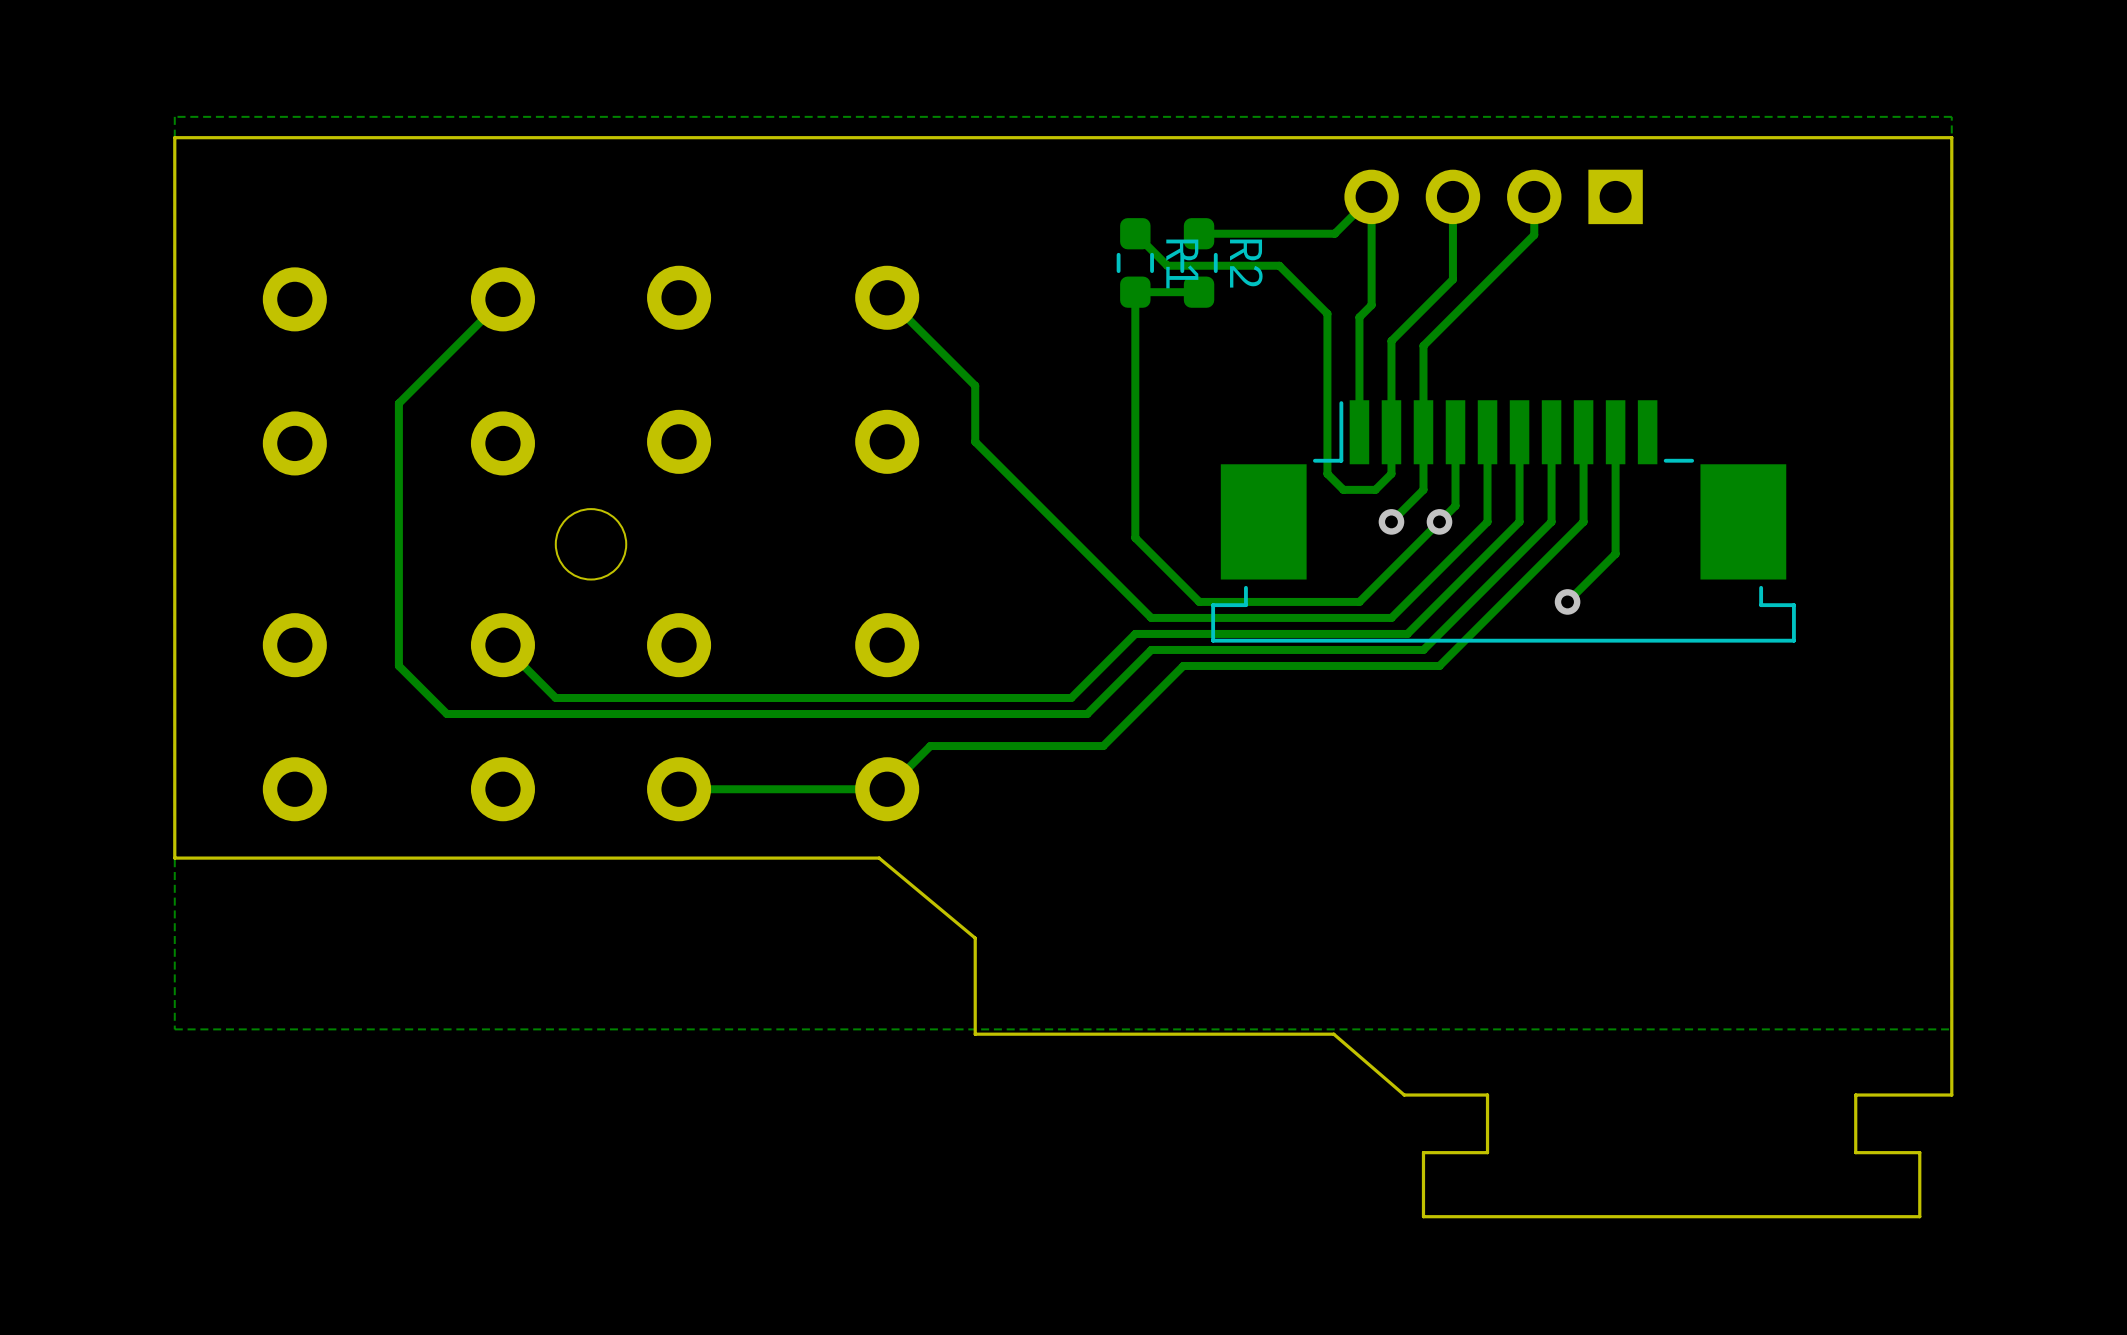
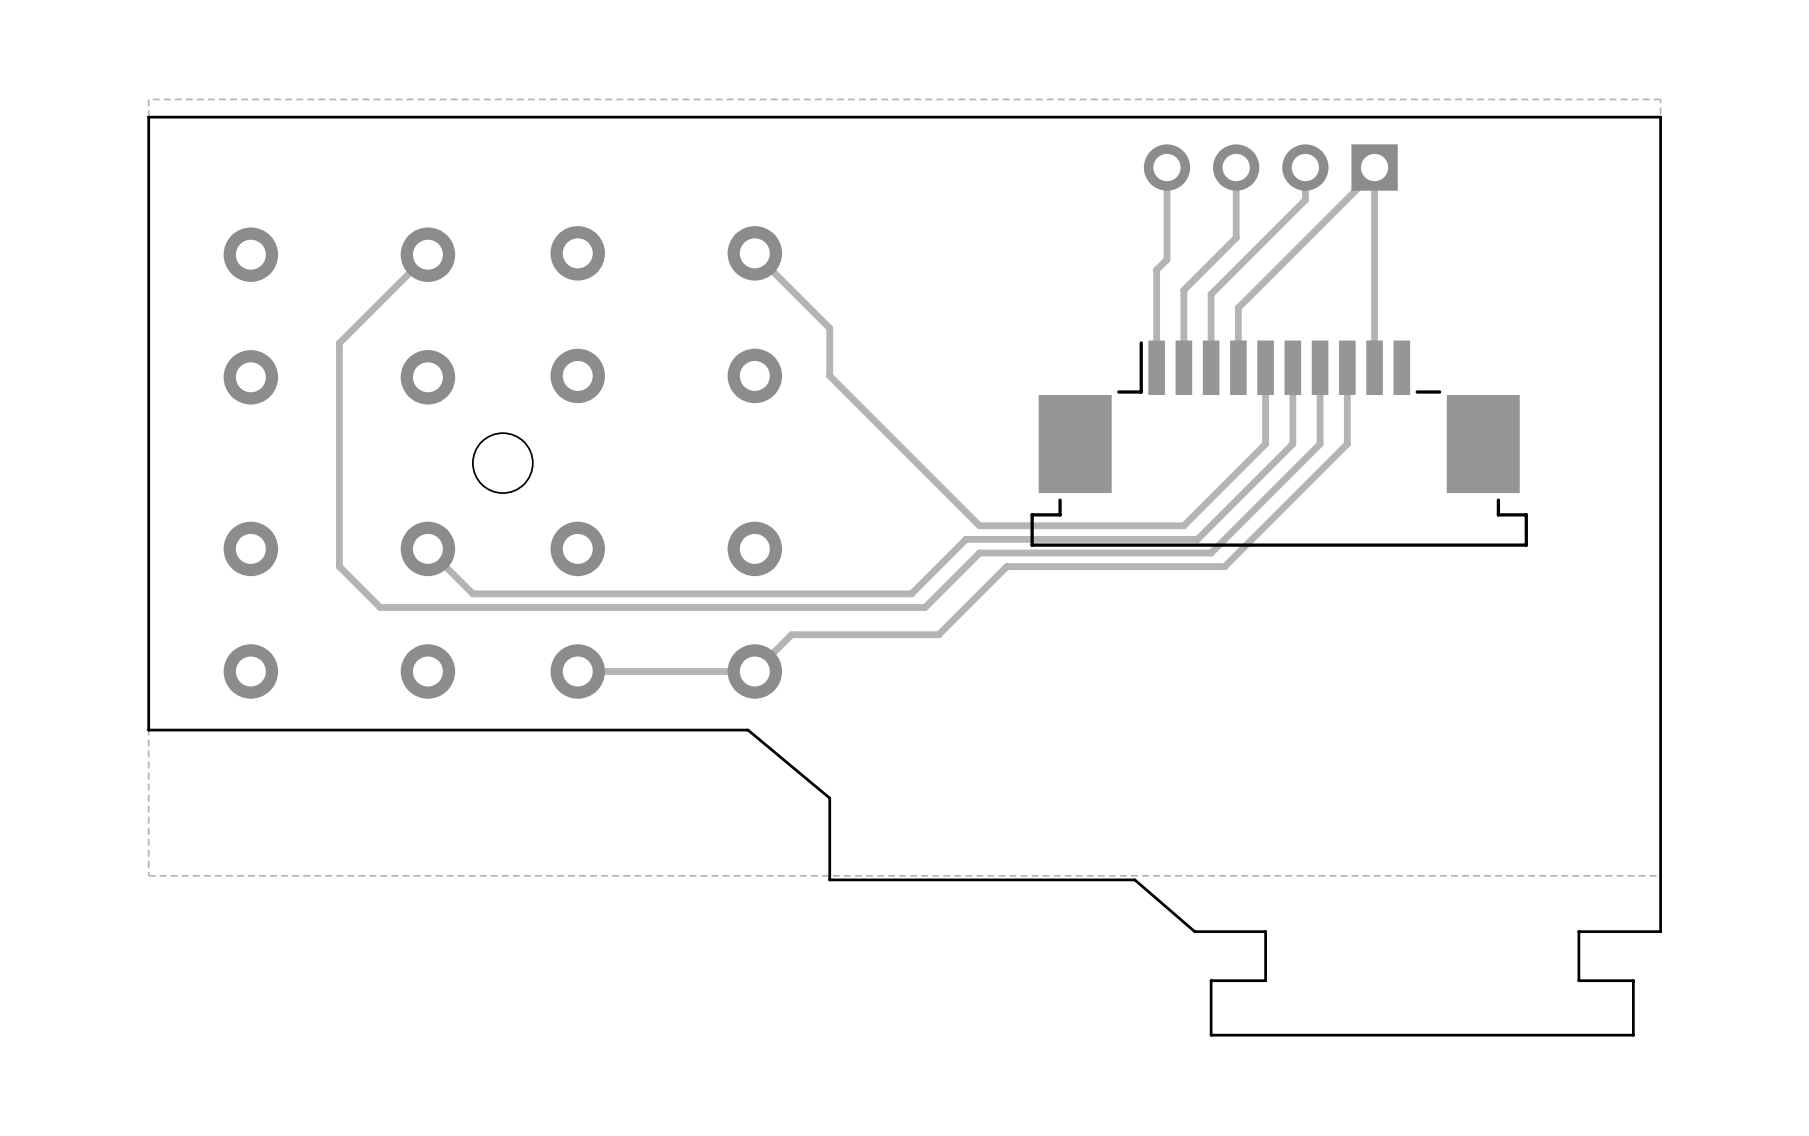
track: (1371, 196) (1334, 233) (1199, 233) -> none
track: (1135, 233) (1167, 265) (1279, 265) (1327, 313) (1327, 473) (1343, 489) (1375, 489) (1391, 473) (1391, 432) -> none
R1: (1135, 262) -> none
R2: (1199, 262) -> none
track: (1199, 292) (1135, 292) (1135, 537) (1199, 601) (1359, 601) (1455, 505) (1455, 432) -> none
track: (1423, 432) (1423, 489) (1391, 521) -> none
track: (1615, 432) (1615, 553) (1567, 601) -> (1374, 367) (1374, 171) (1238, 307) (1238, 367)
via: (1391, 521) -> none
via: (1439, 521) -> none
via: (1567, 601) -> none

